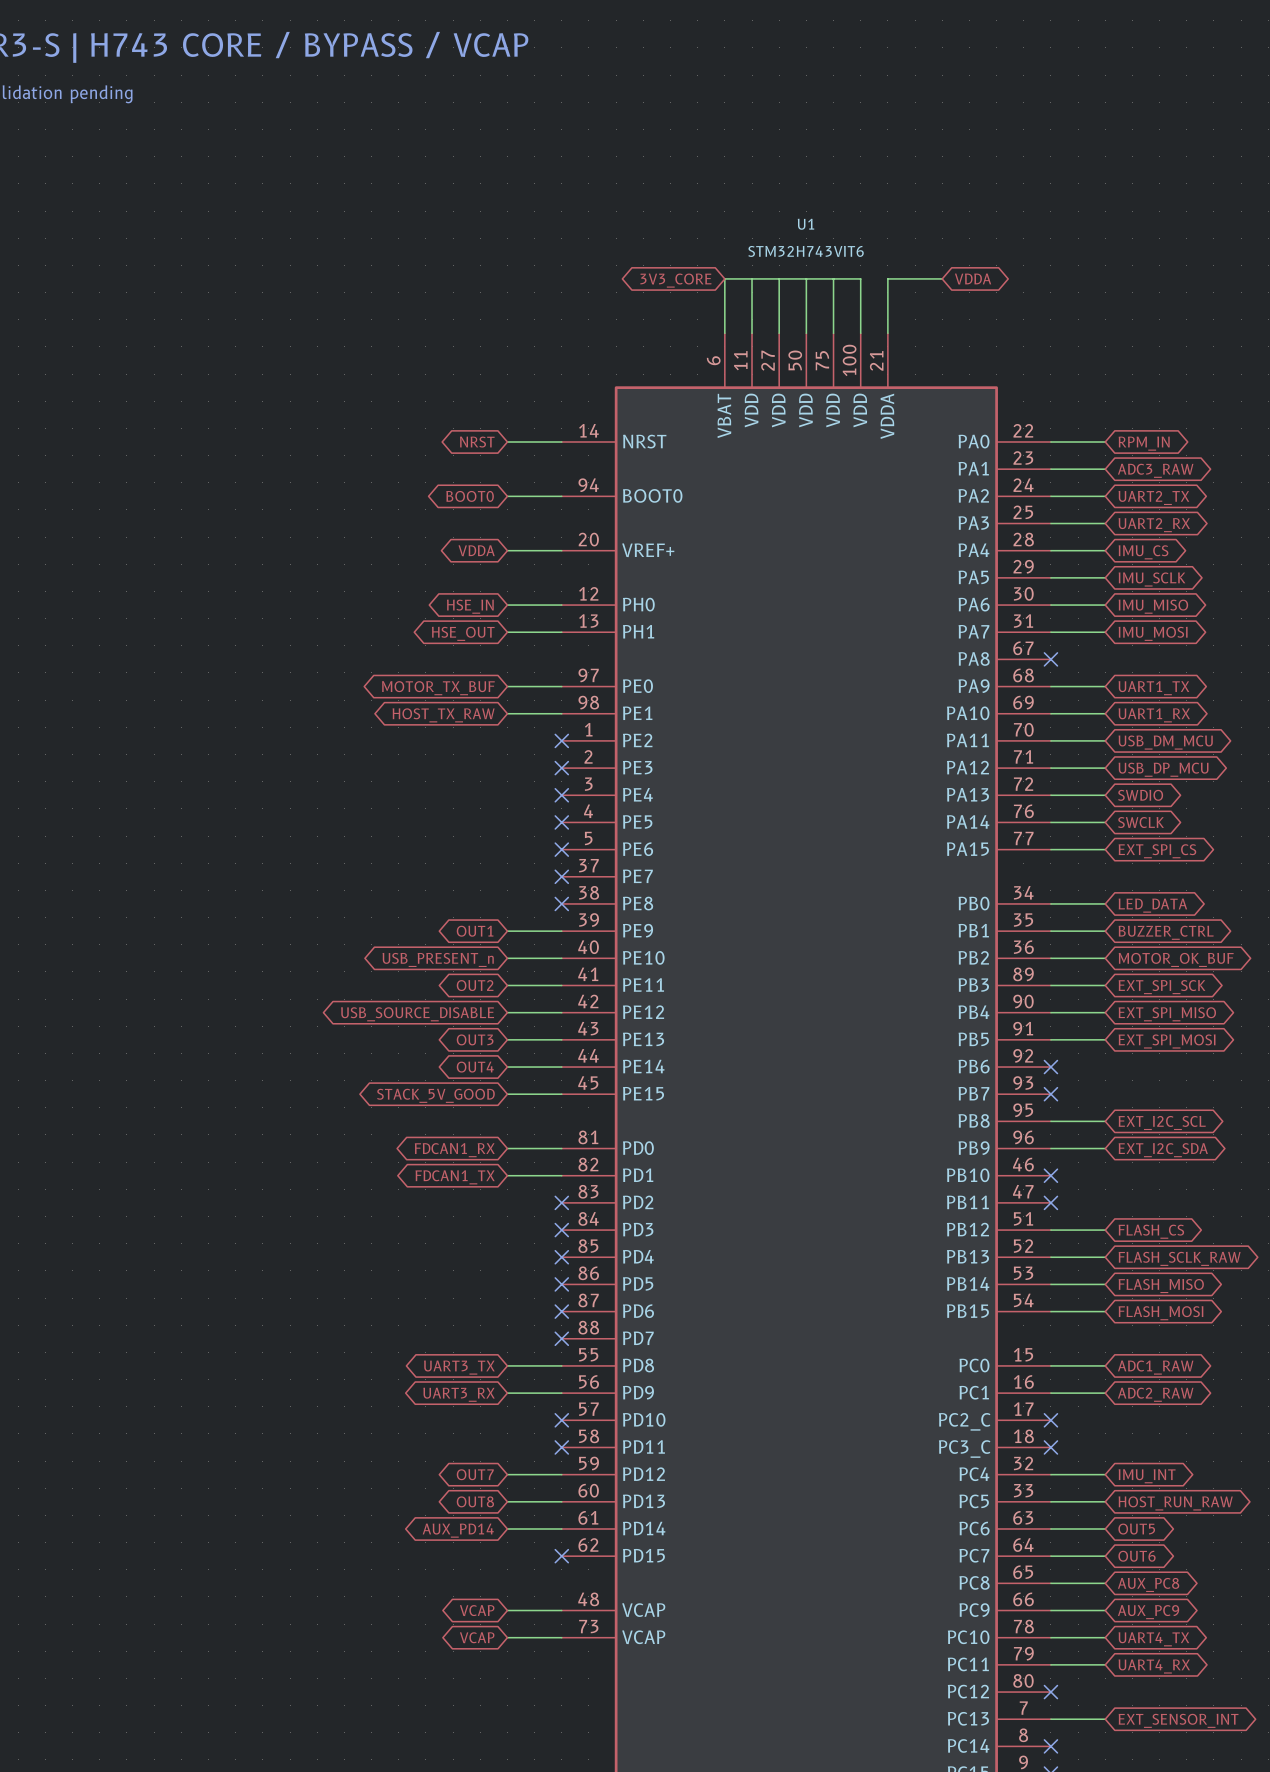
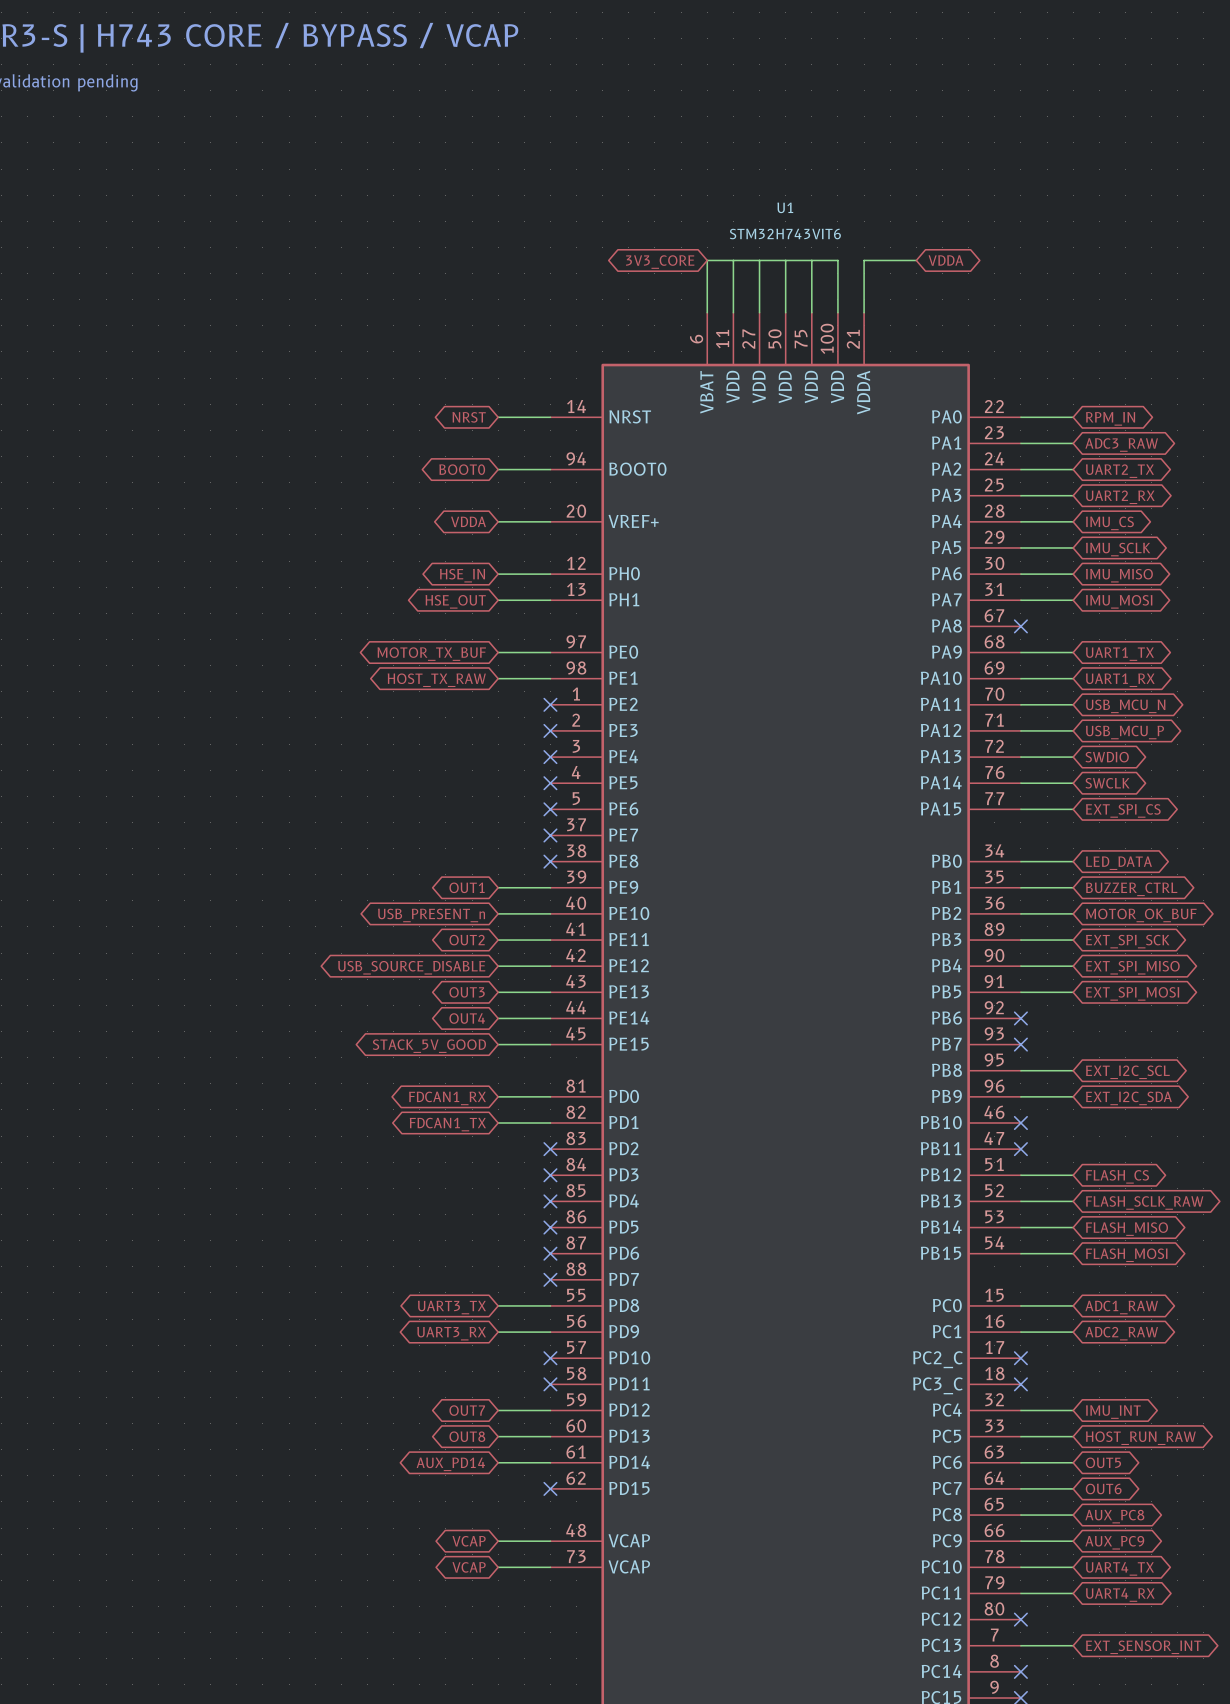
global label: USB_DM_MCU (1165, 742) -> USB_MCU_N (1125, 706)
global label: USB_DP_MCU (1163, 769) -> USB_MCU_P (1124, 732)

